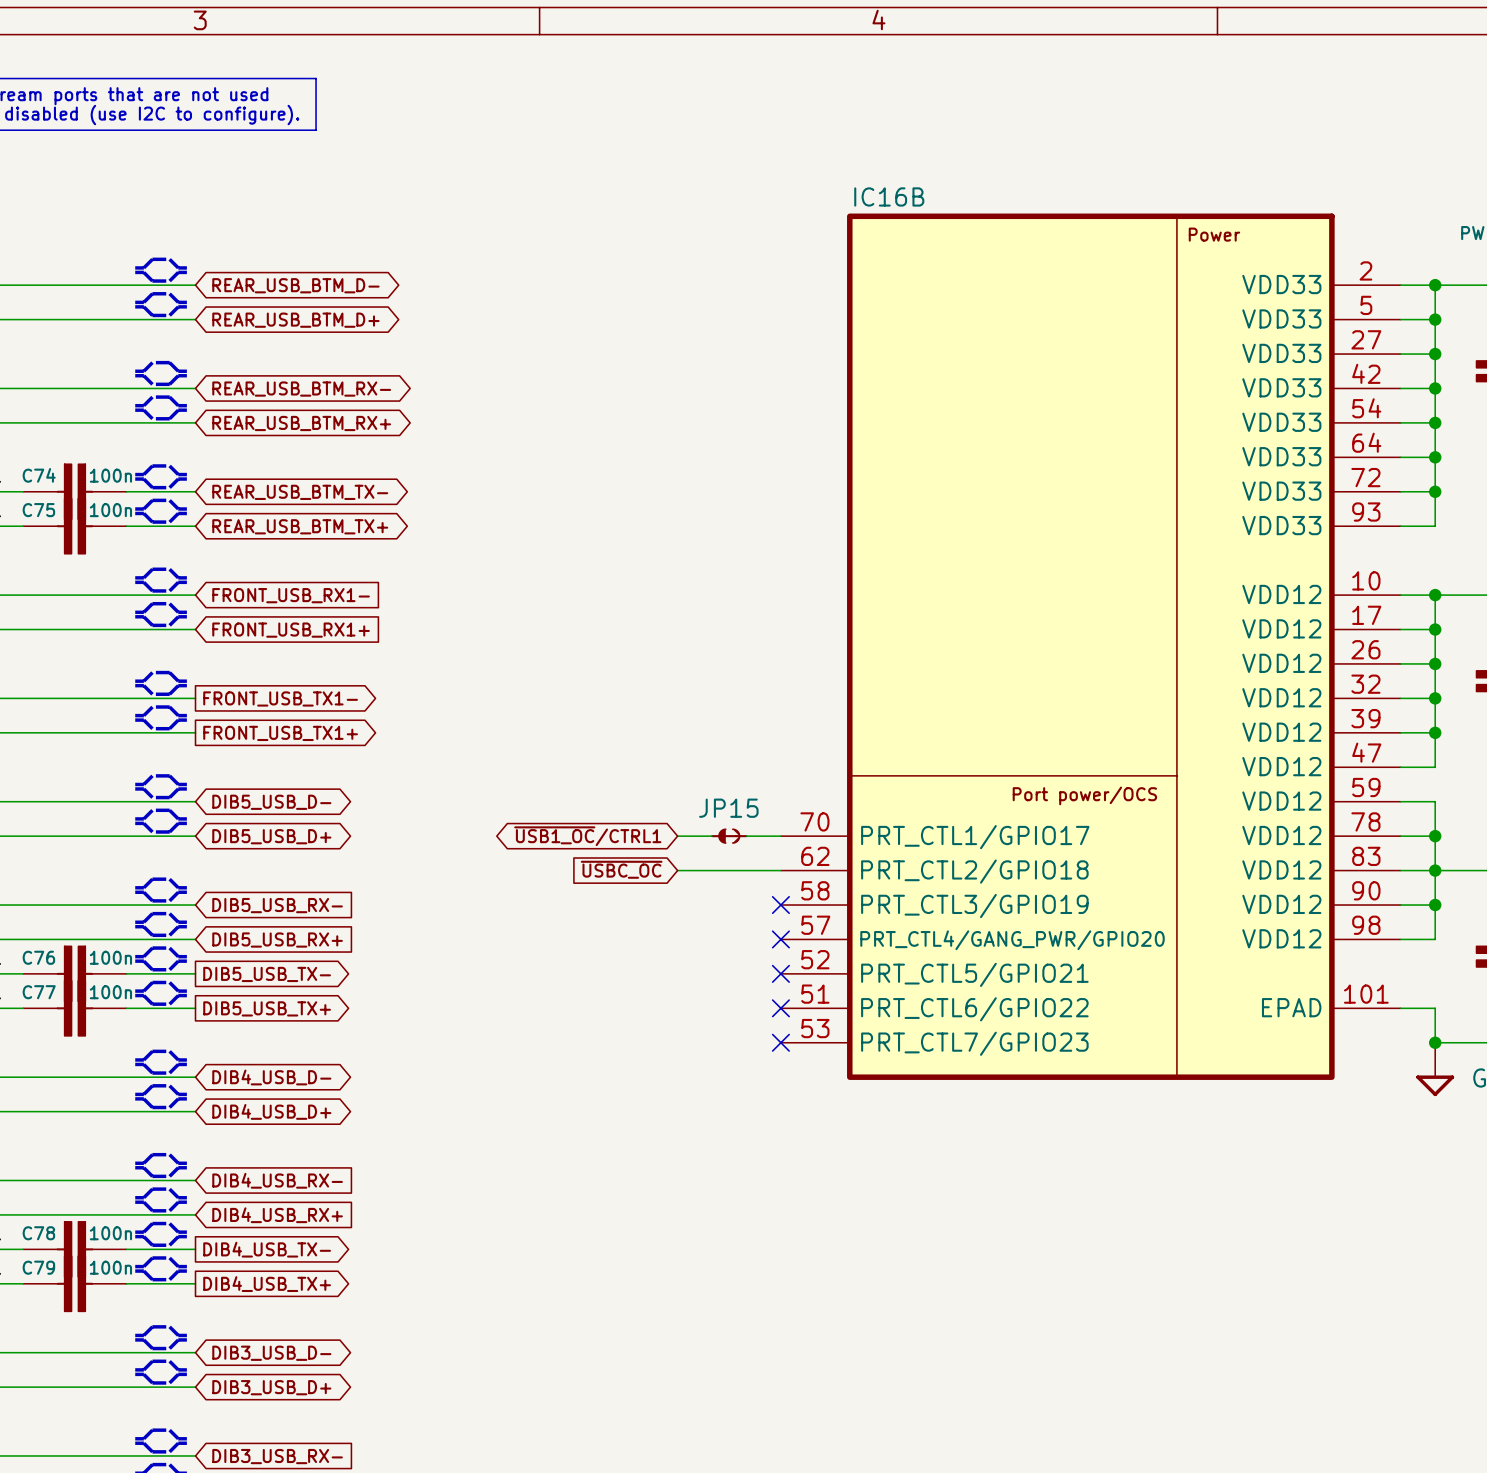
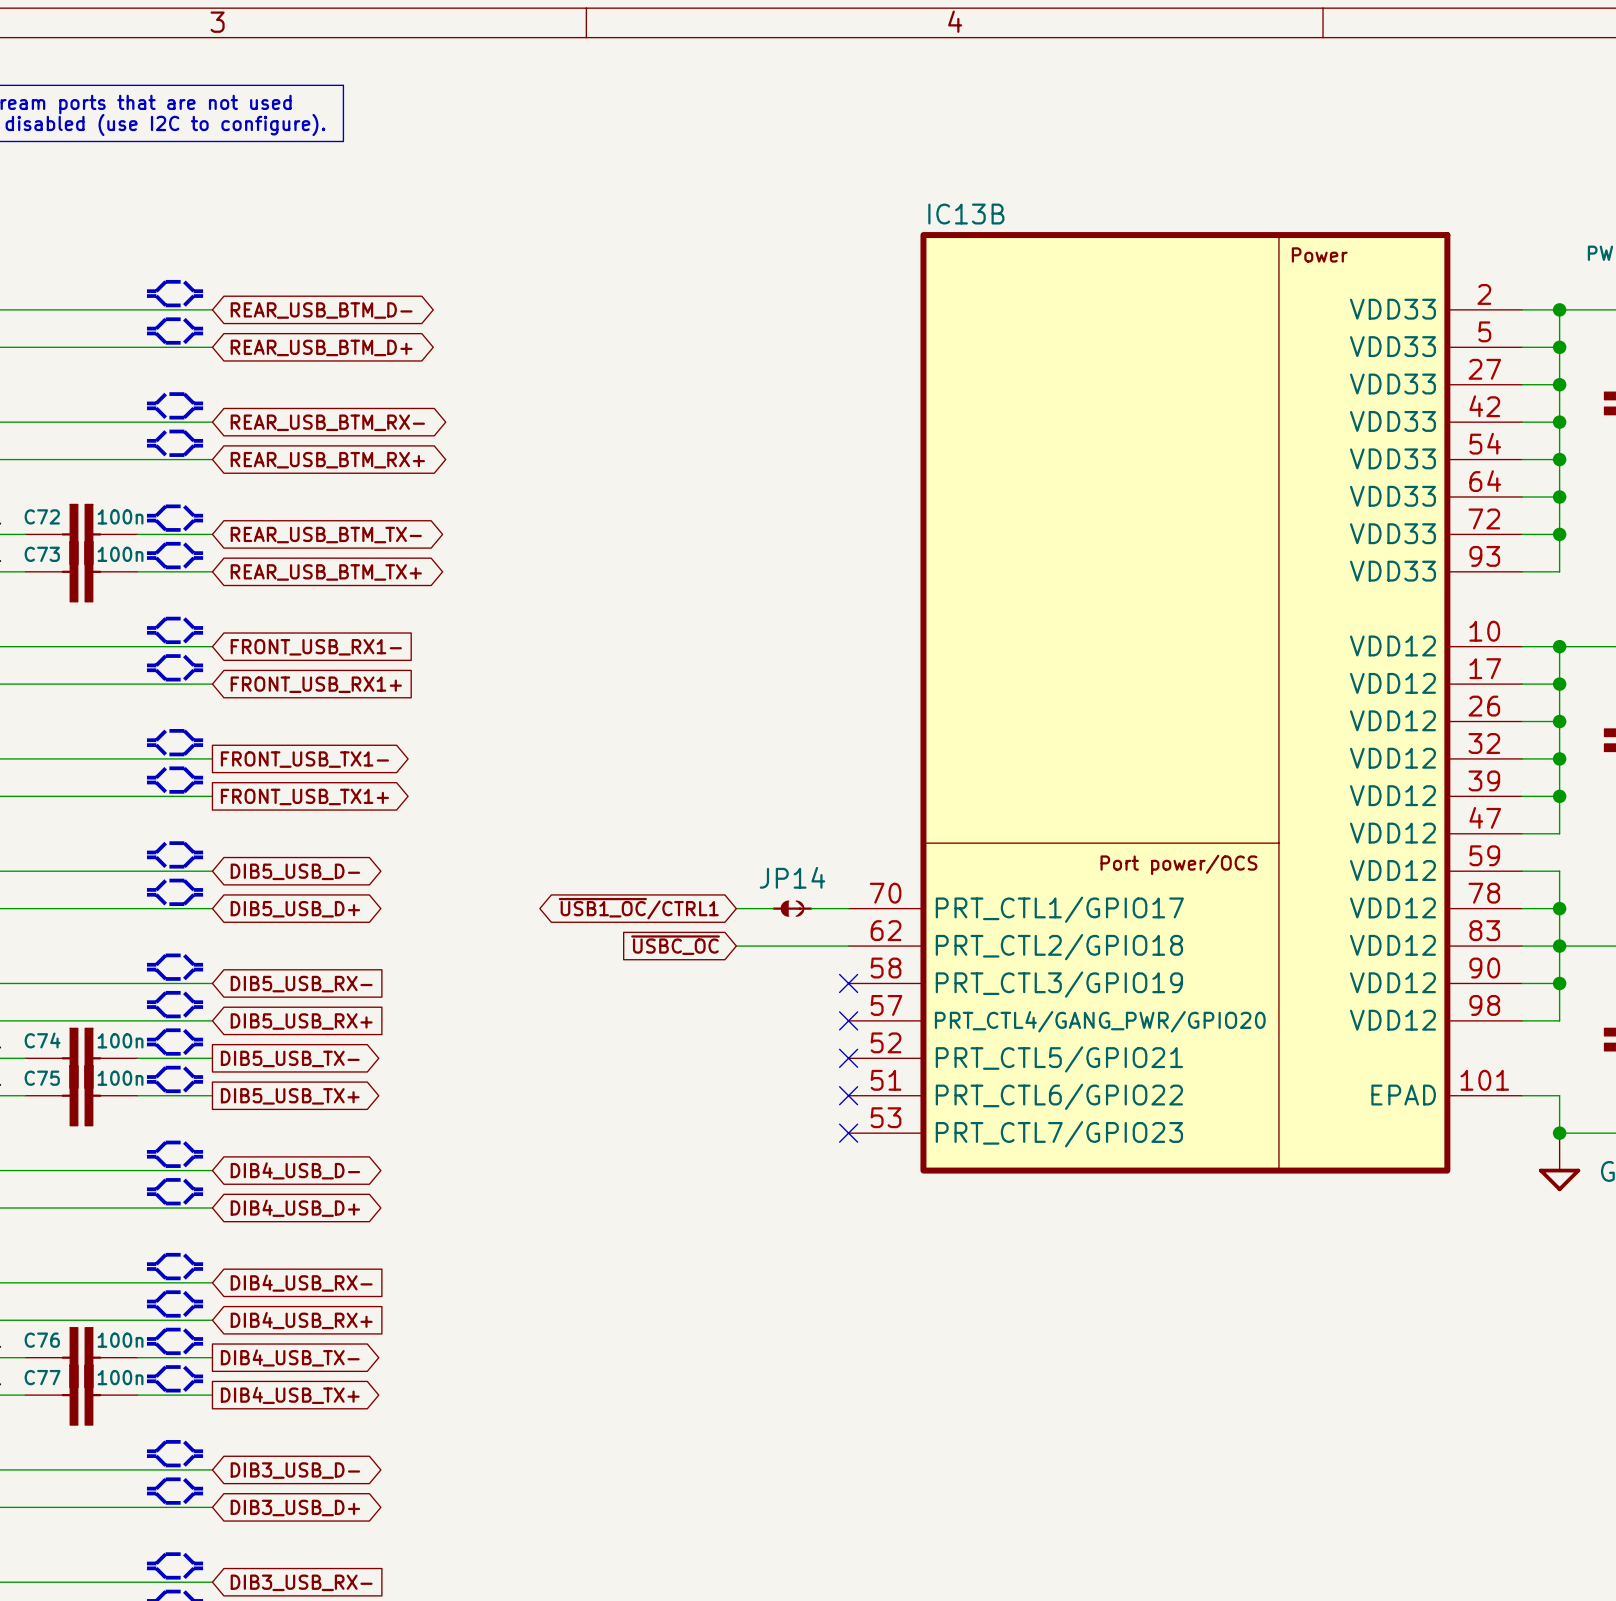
IC16B name: IC16B (889, 196) -> IC13B (966, 214)
C74 name: C74 (39, 475) -> C72 (42, 516)
C75 name: C75 (38, 510) -> C73 (42, 554)
JP15 name: JP15 (728, 808) -> JP14 (792, 877)
C76 name: C76 (38, 957) -> C74 (42, 1040)
C77 name: C77 (39, 992) -> C75 (42, 1078)
C78 name: C78 (38, 1233) -> C76 (42, 1340)
C79 name: C79 (38, 1267) -> C77 (42, 1377)

